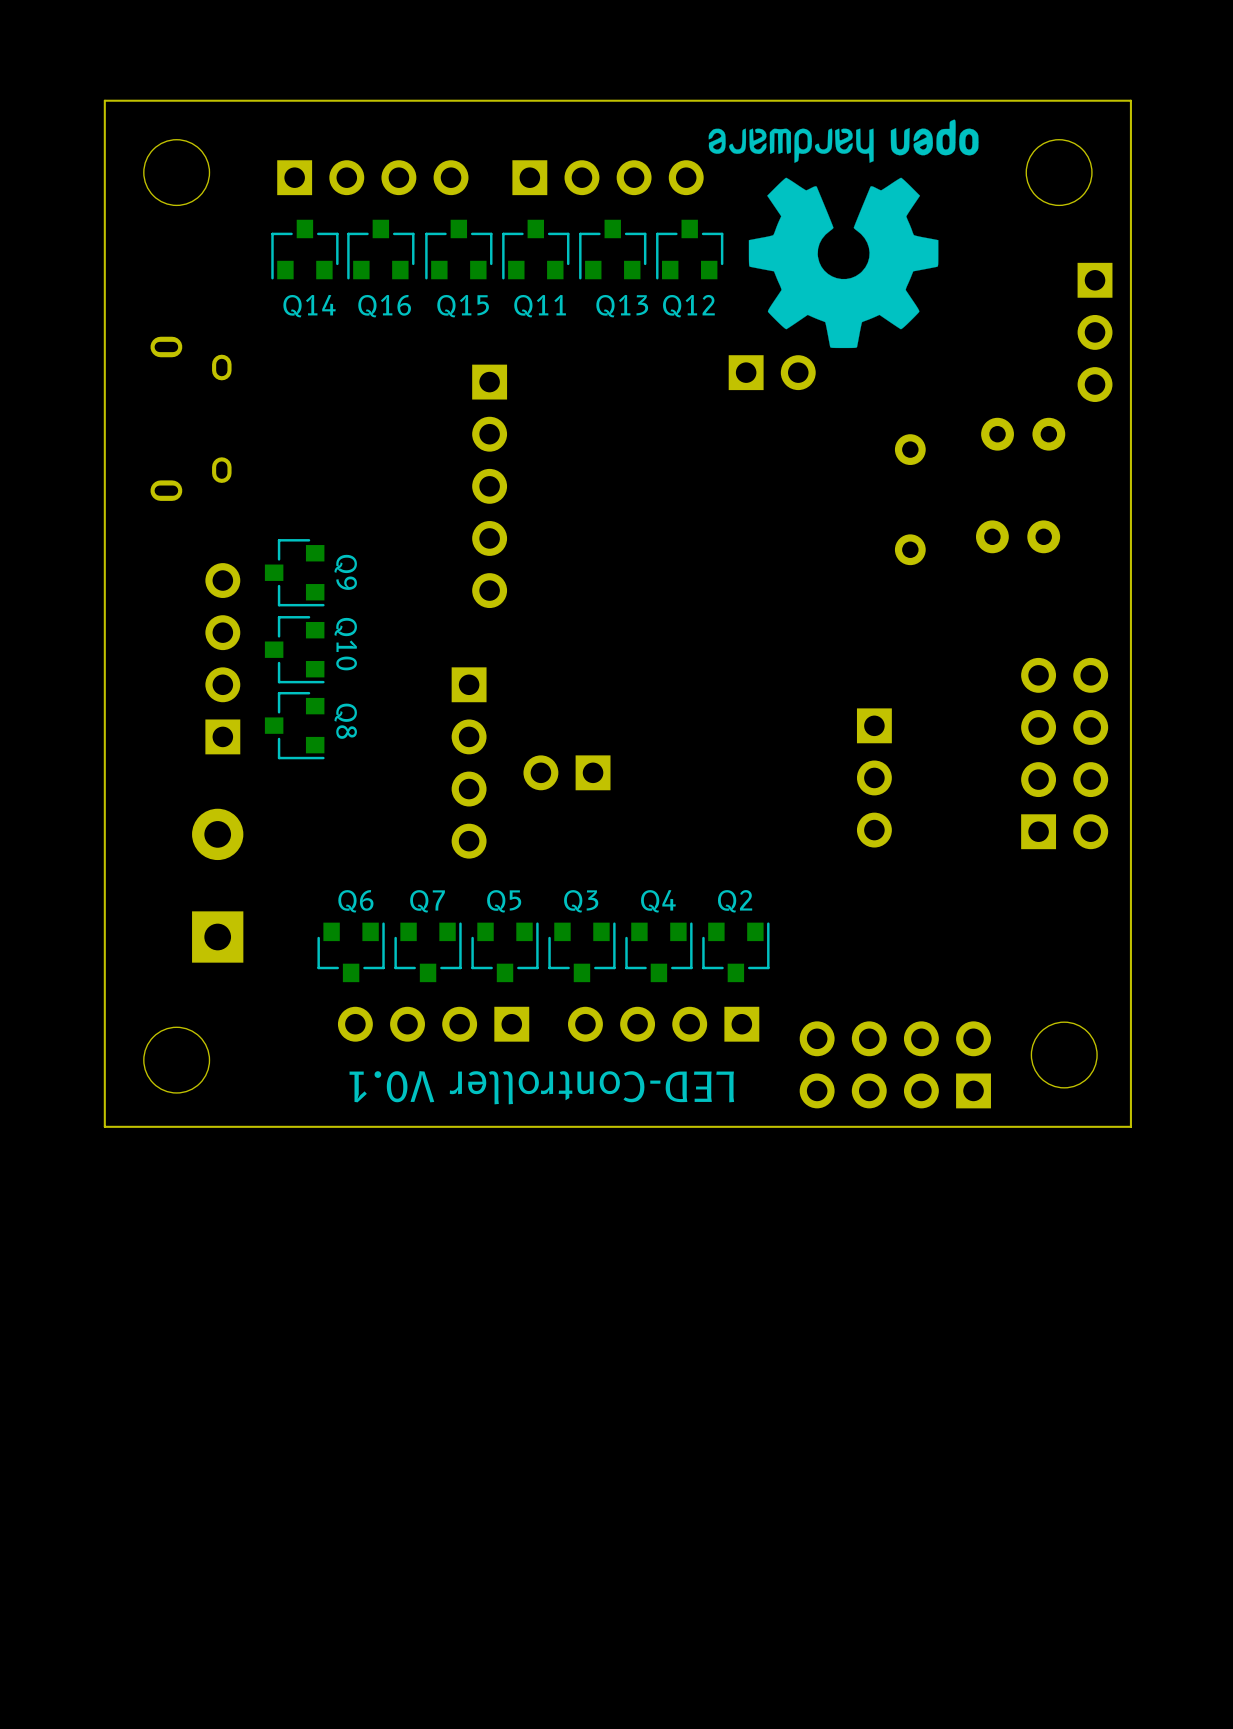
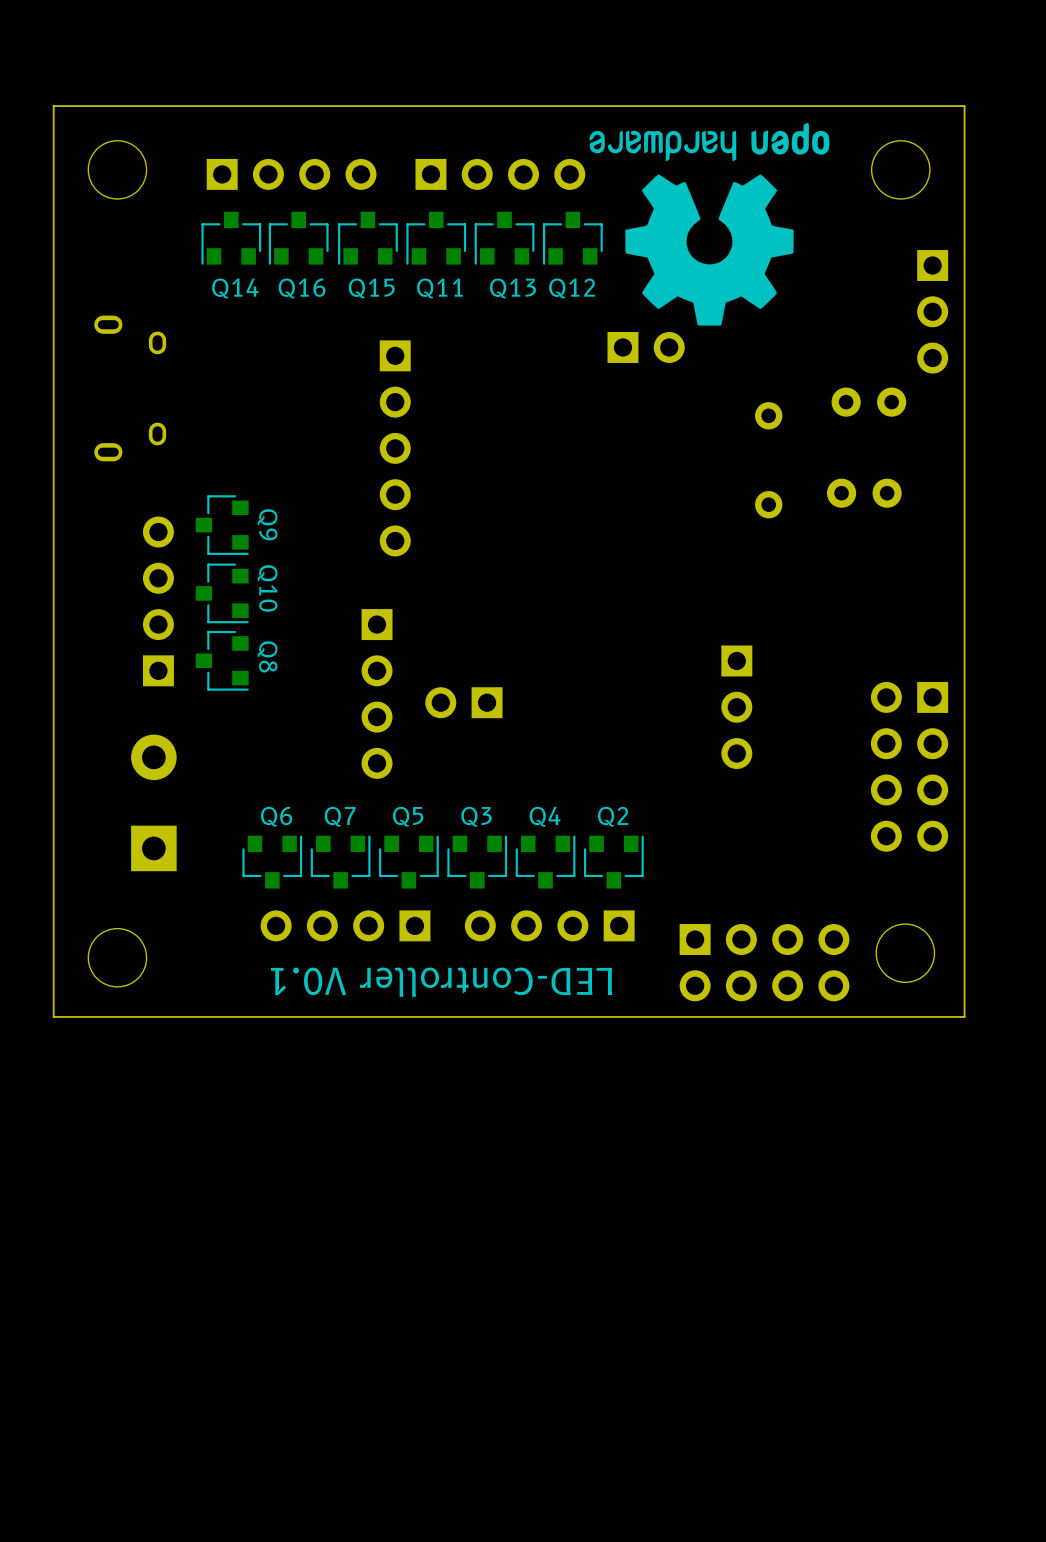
part rotation: 0° (1064, 753) -> 180° (909, 766)
part rotation: 0° (895, 1064) -> 180° (764, 962)

